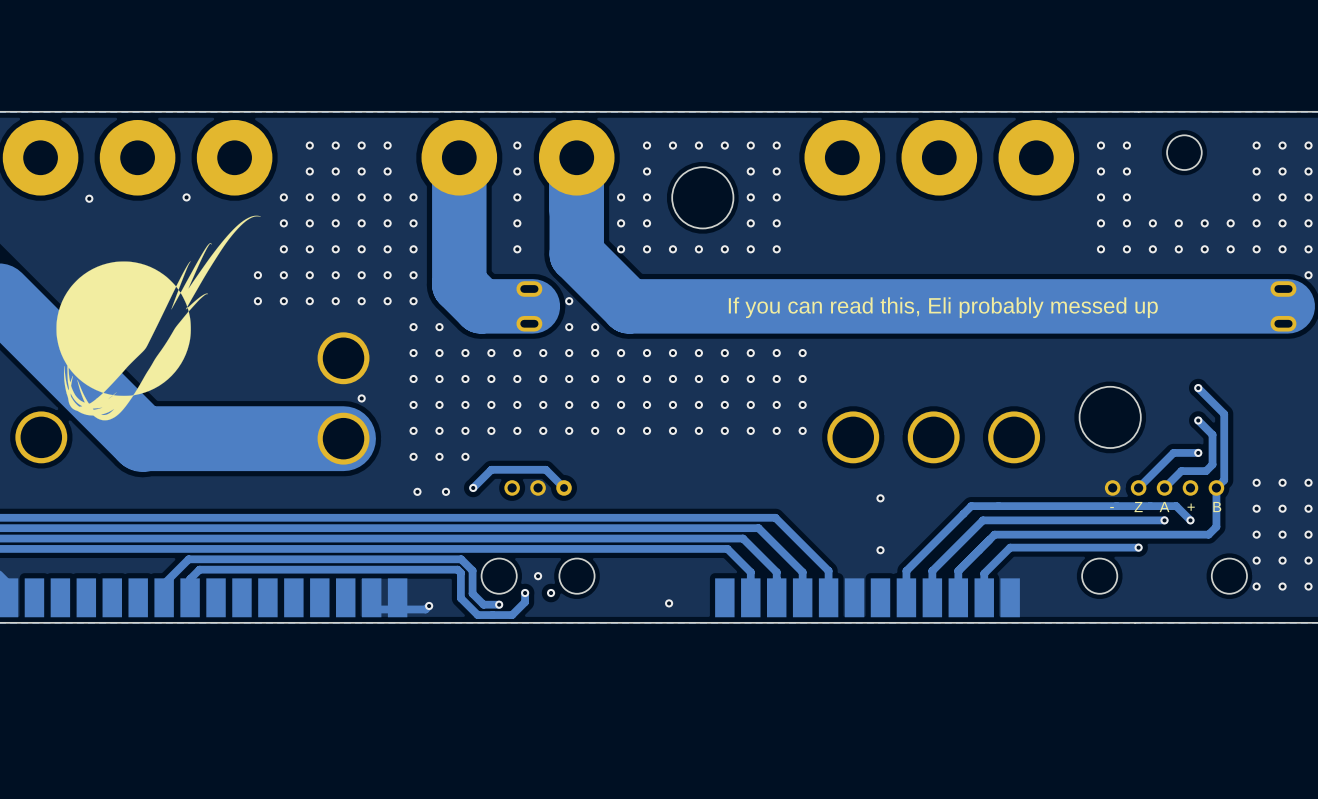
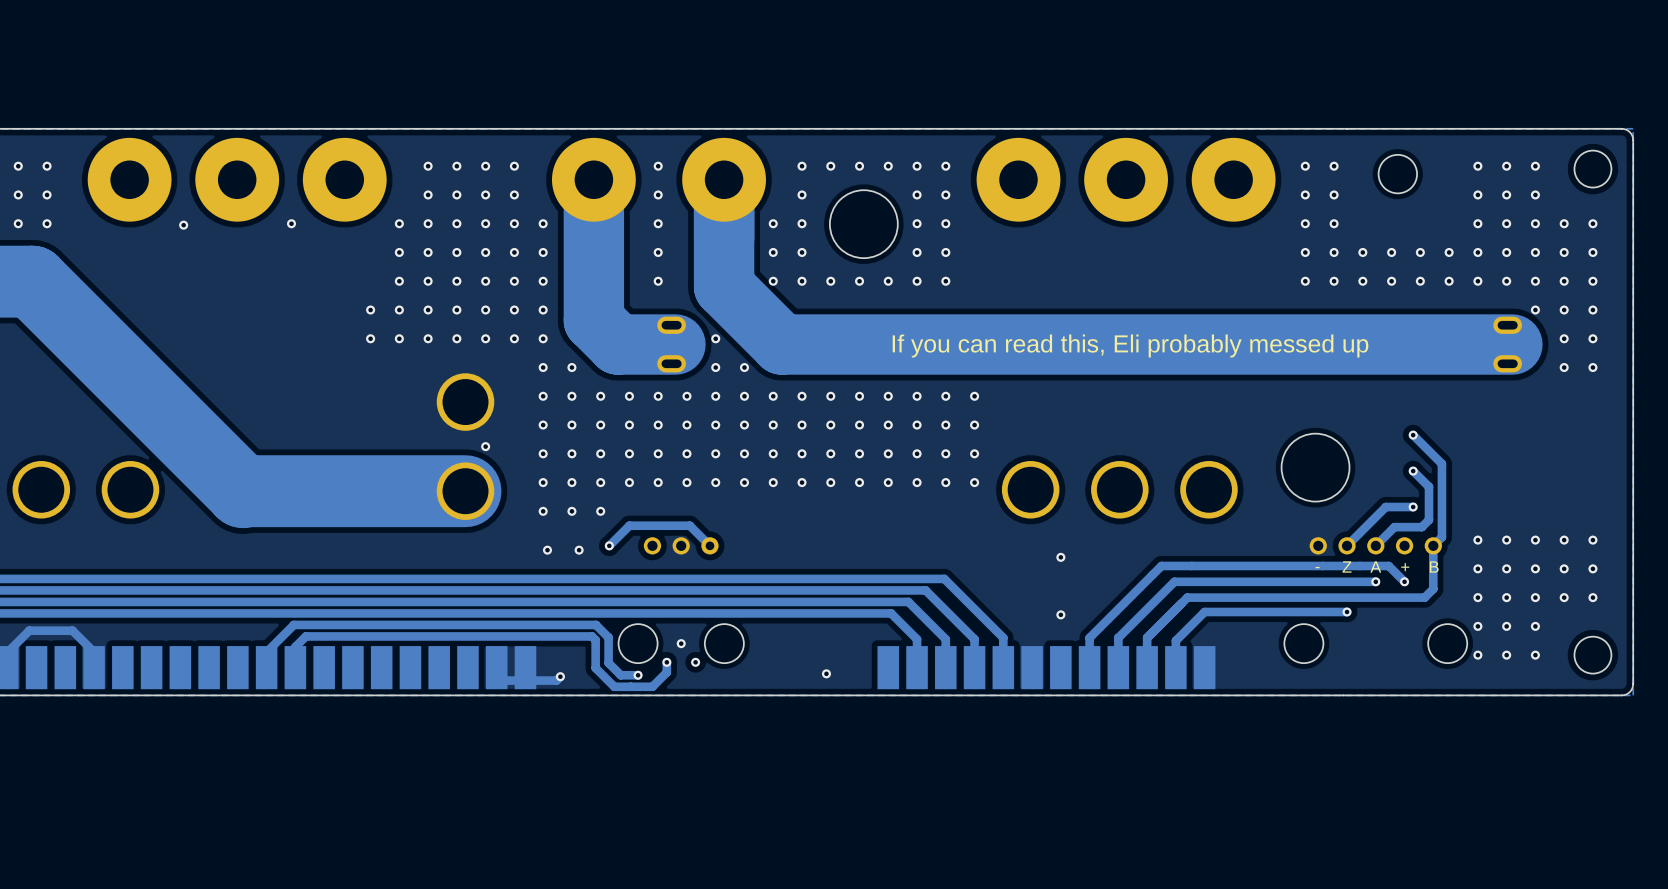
drawing: [56, 215, 262, 421] -> none

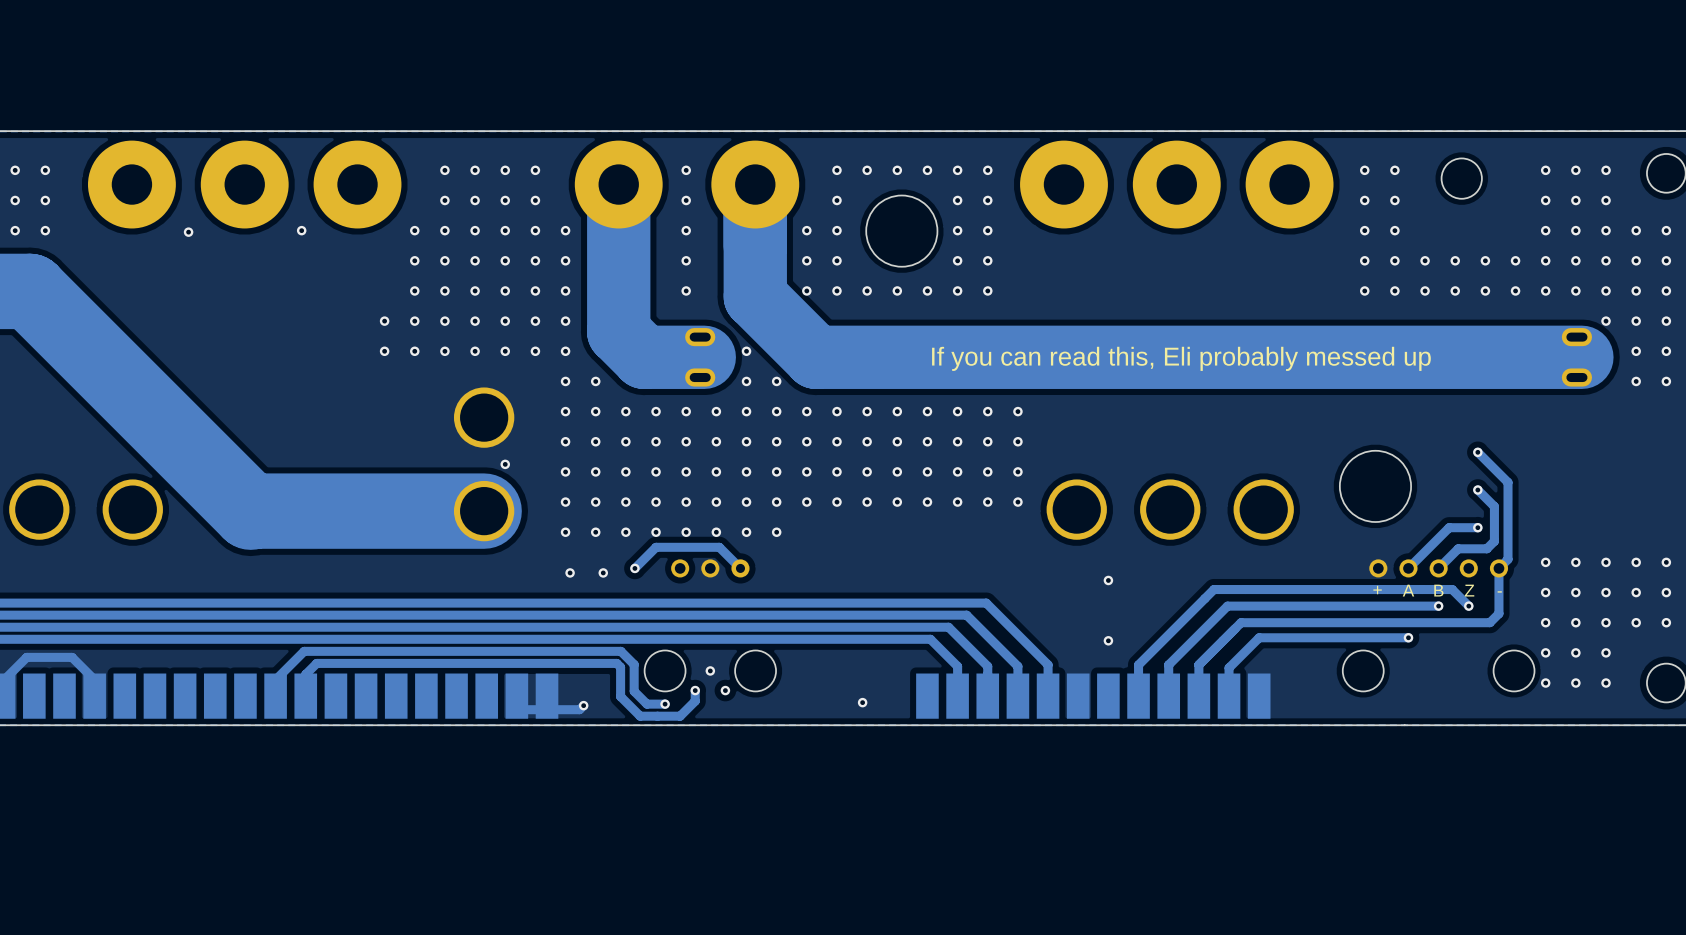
via: none -> (656, 532)
via: none -> (686, 532)
via: none -> (716, 532)
via: none -> (746, 532)
via: none -> (776, 532)
text: Z (1347, 566) -> A (1408, 590)
text: A (1375, 566) -> B (1438, 590)
text: B (1434, 566) -> - (1499, 591)
text: - (1317, 567) -> + (1377, 590)
text: + (1405, 567) -> Z (1469, 590)

